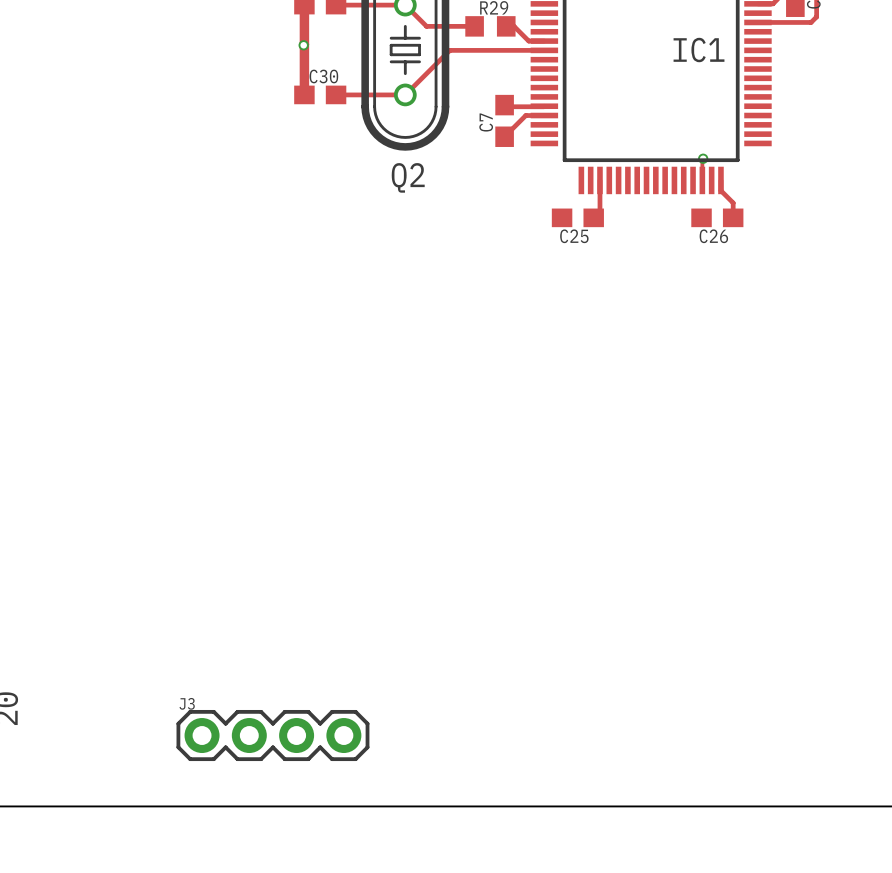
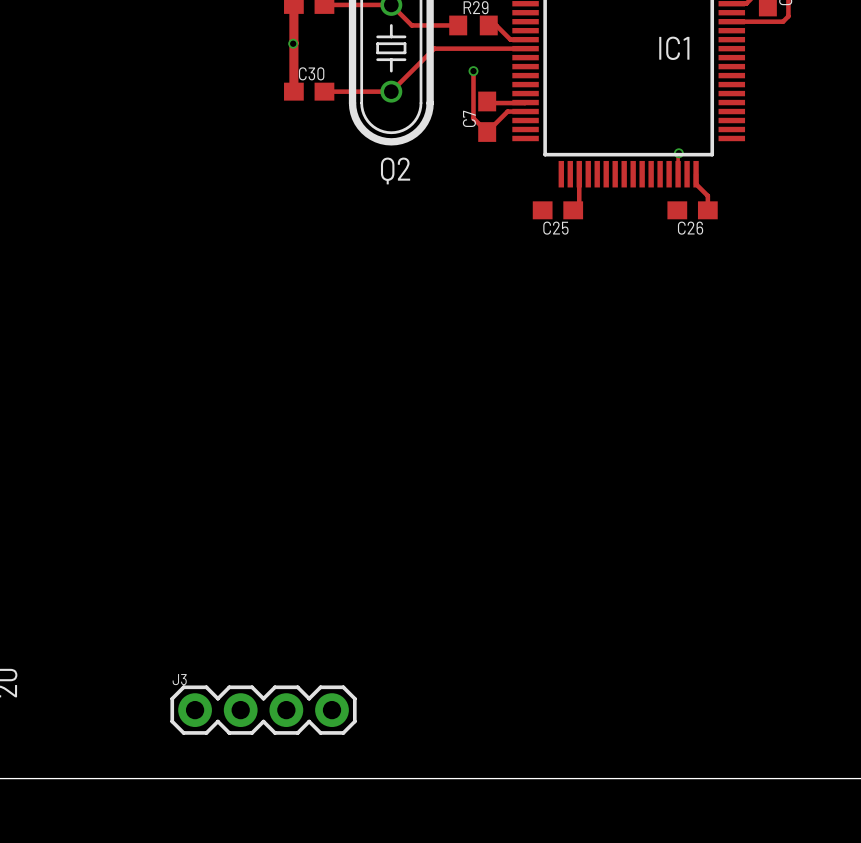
track: none -> (473, 71) (473, 118) (487, 132)
via: none -> (473, 71)

